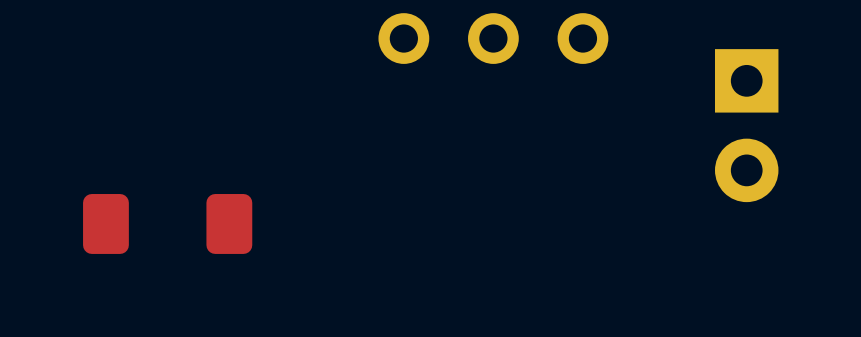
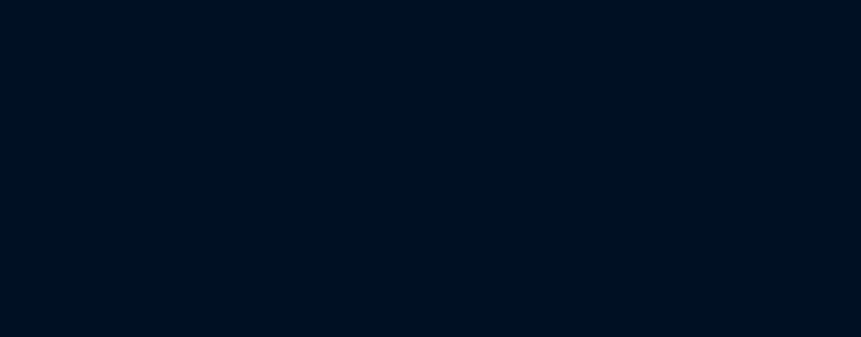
part: (493, 38) -> none
part: (746, 125) -> none
part: (167, 223) -> none

